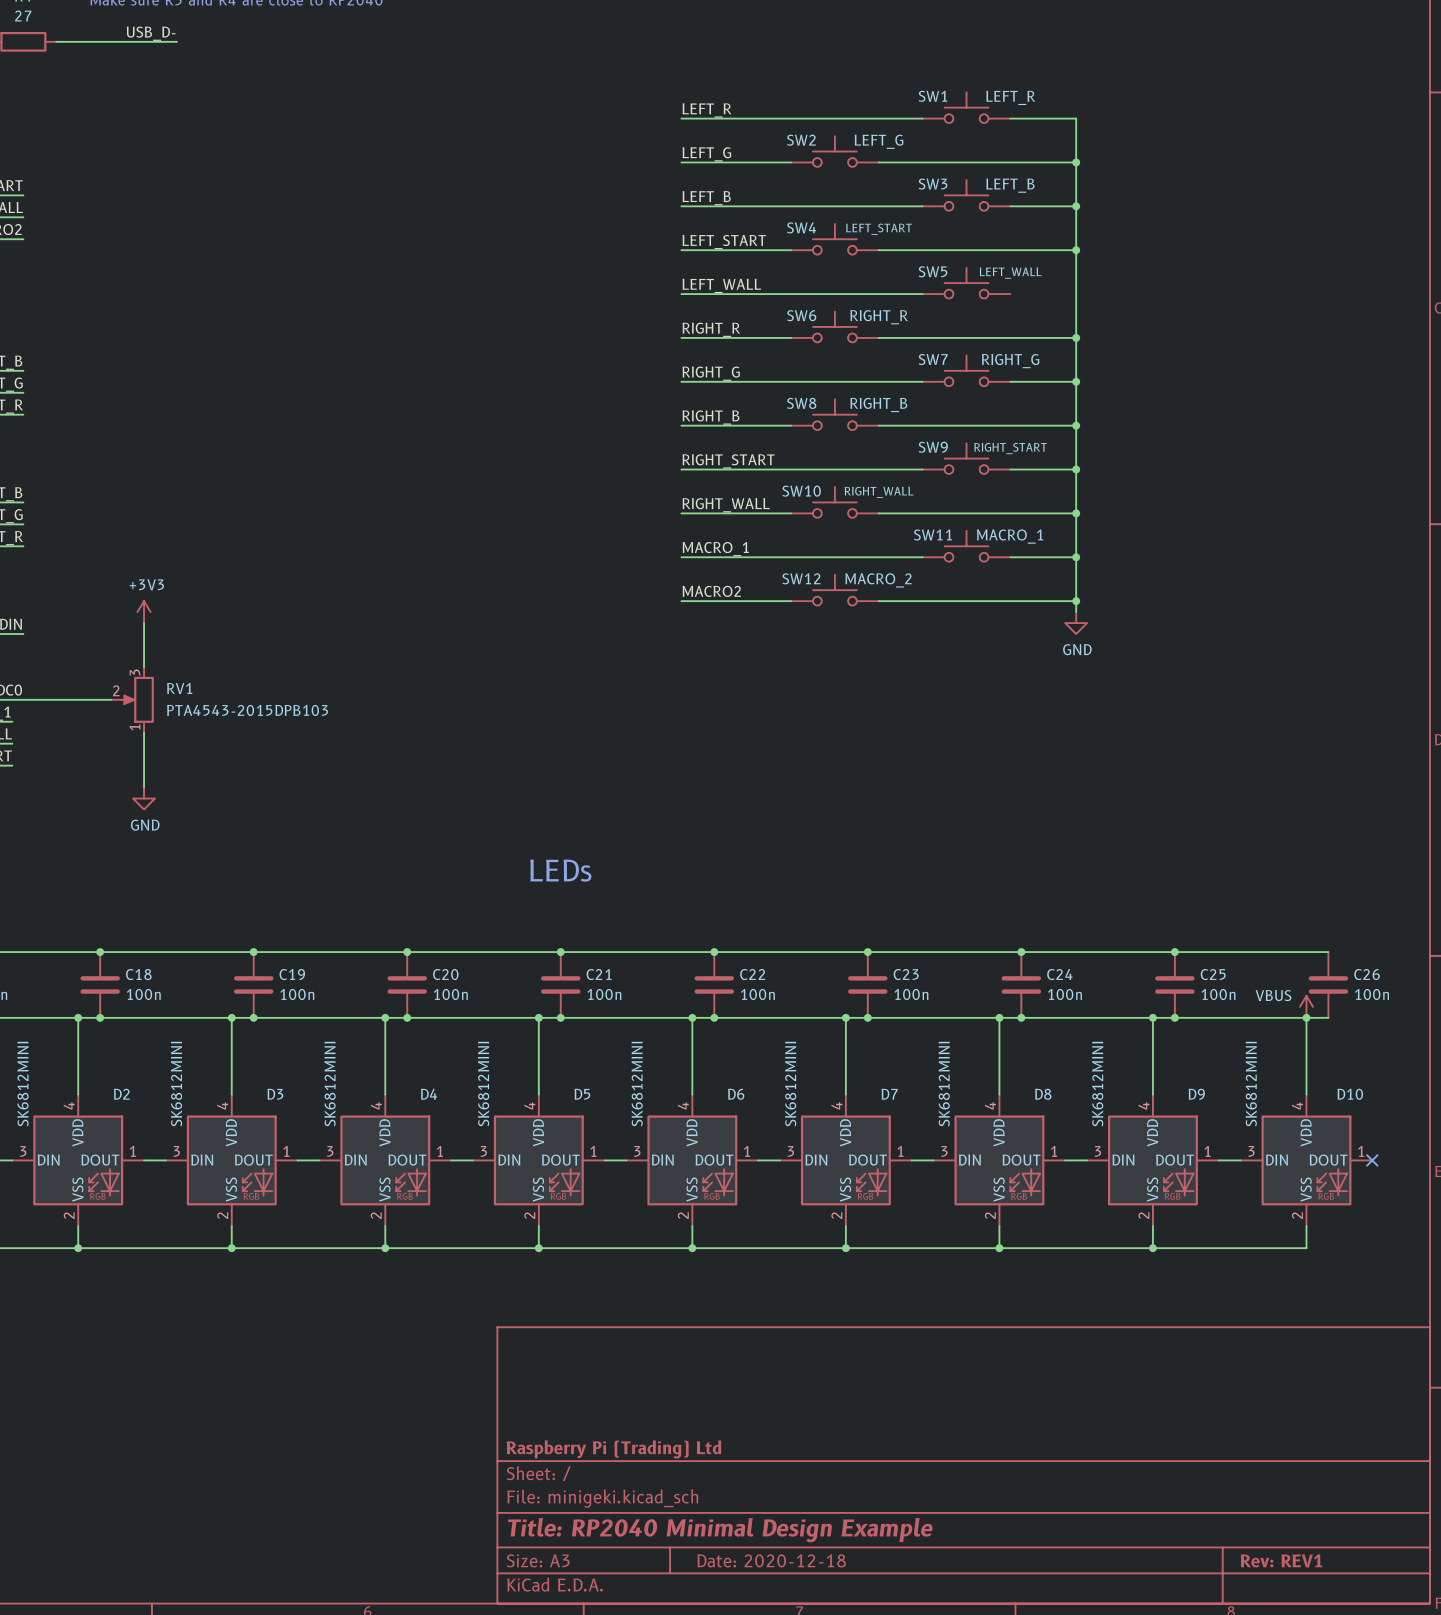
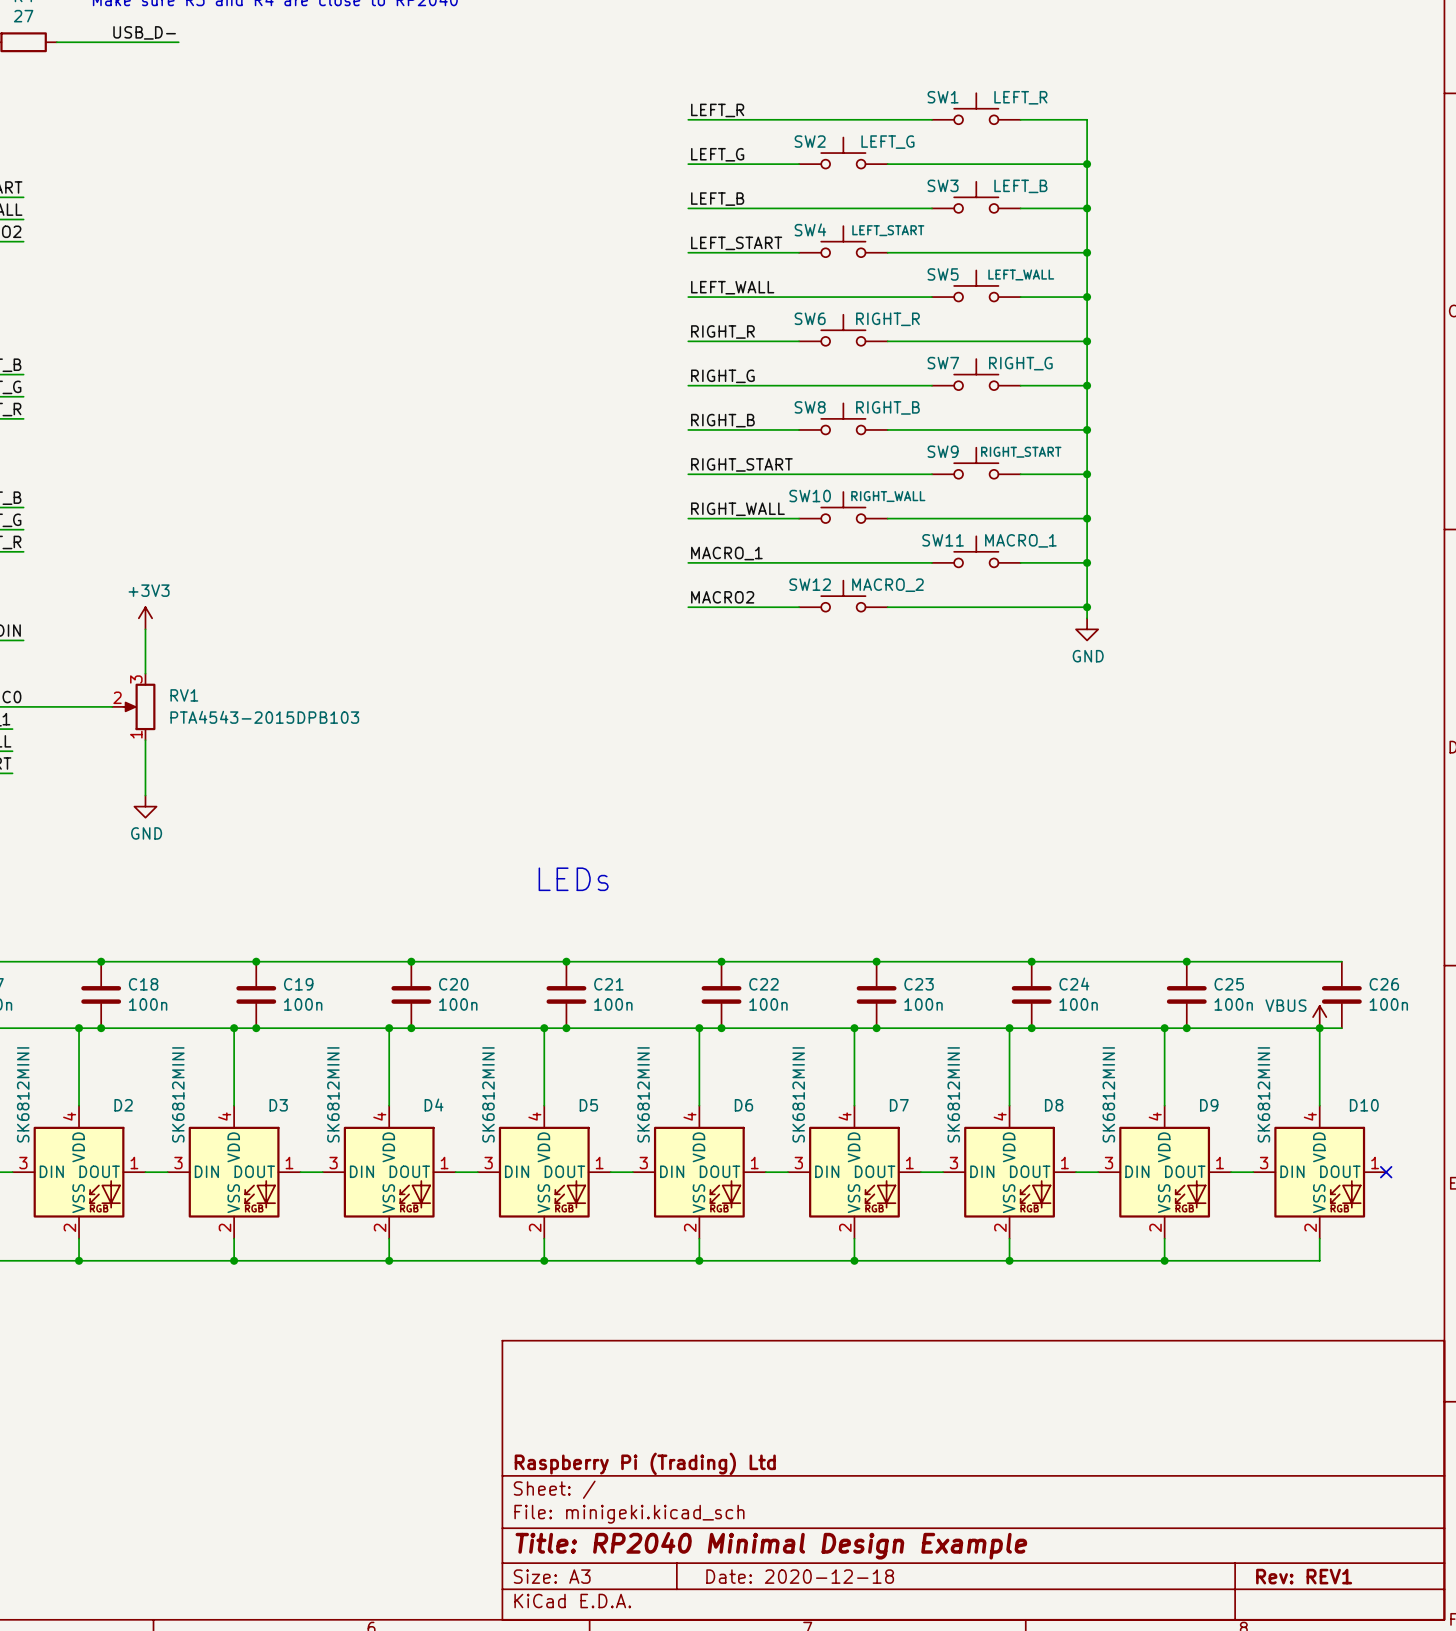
wire: none -> (1020, 297) (1087, 297)
junction: none -> (1087, 297)

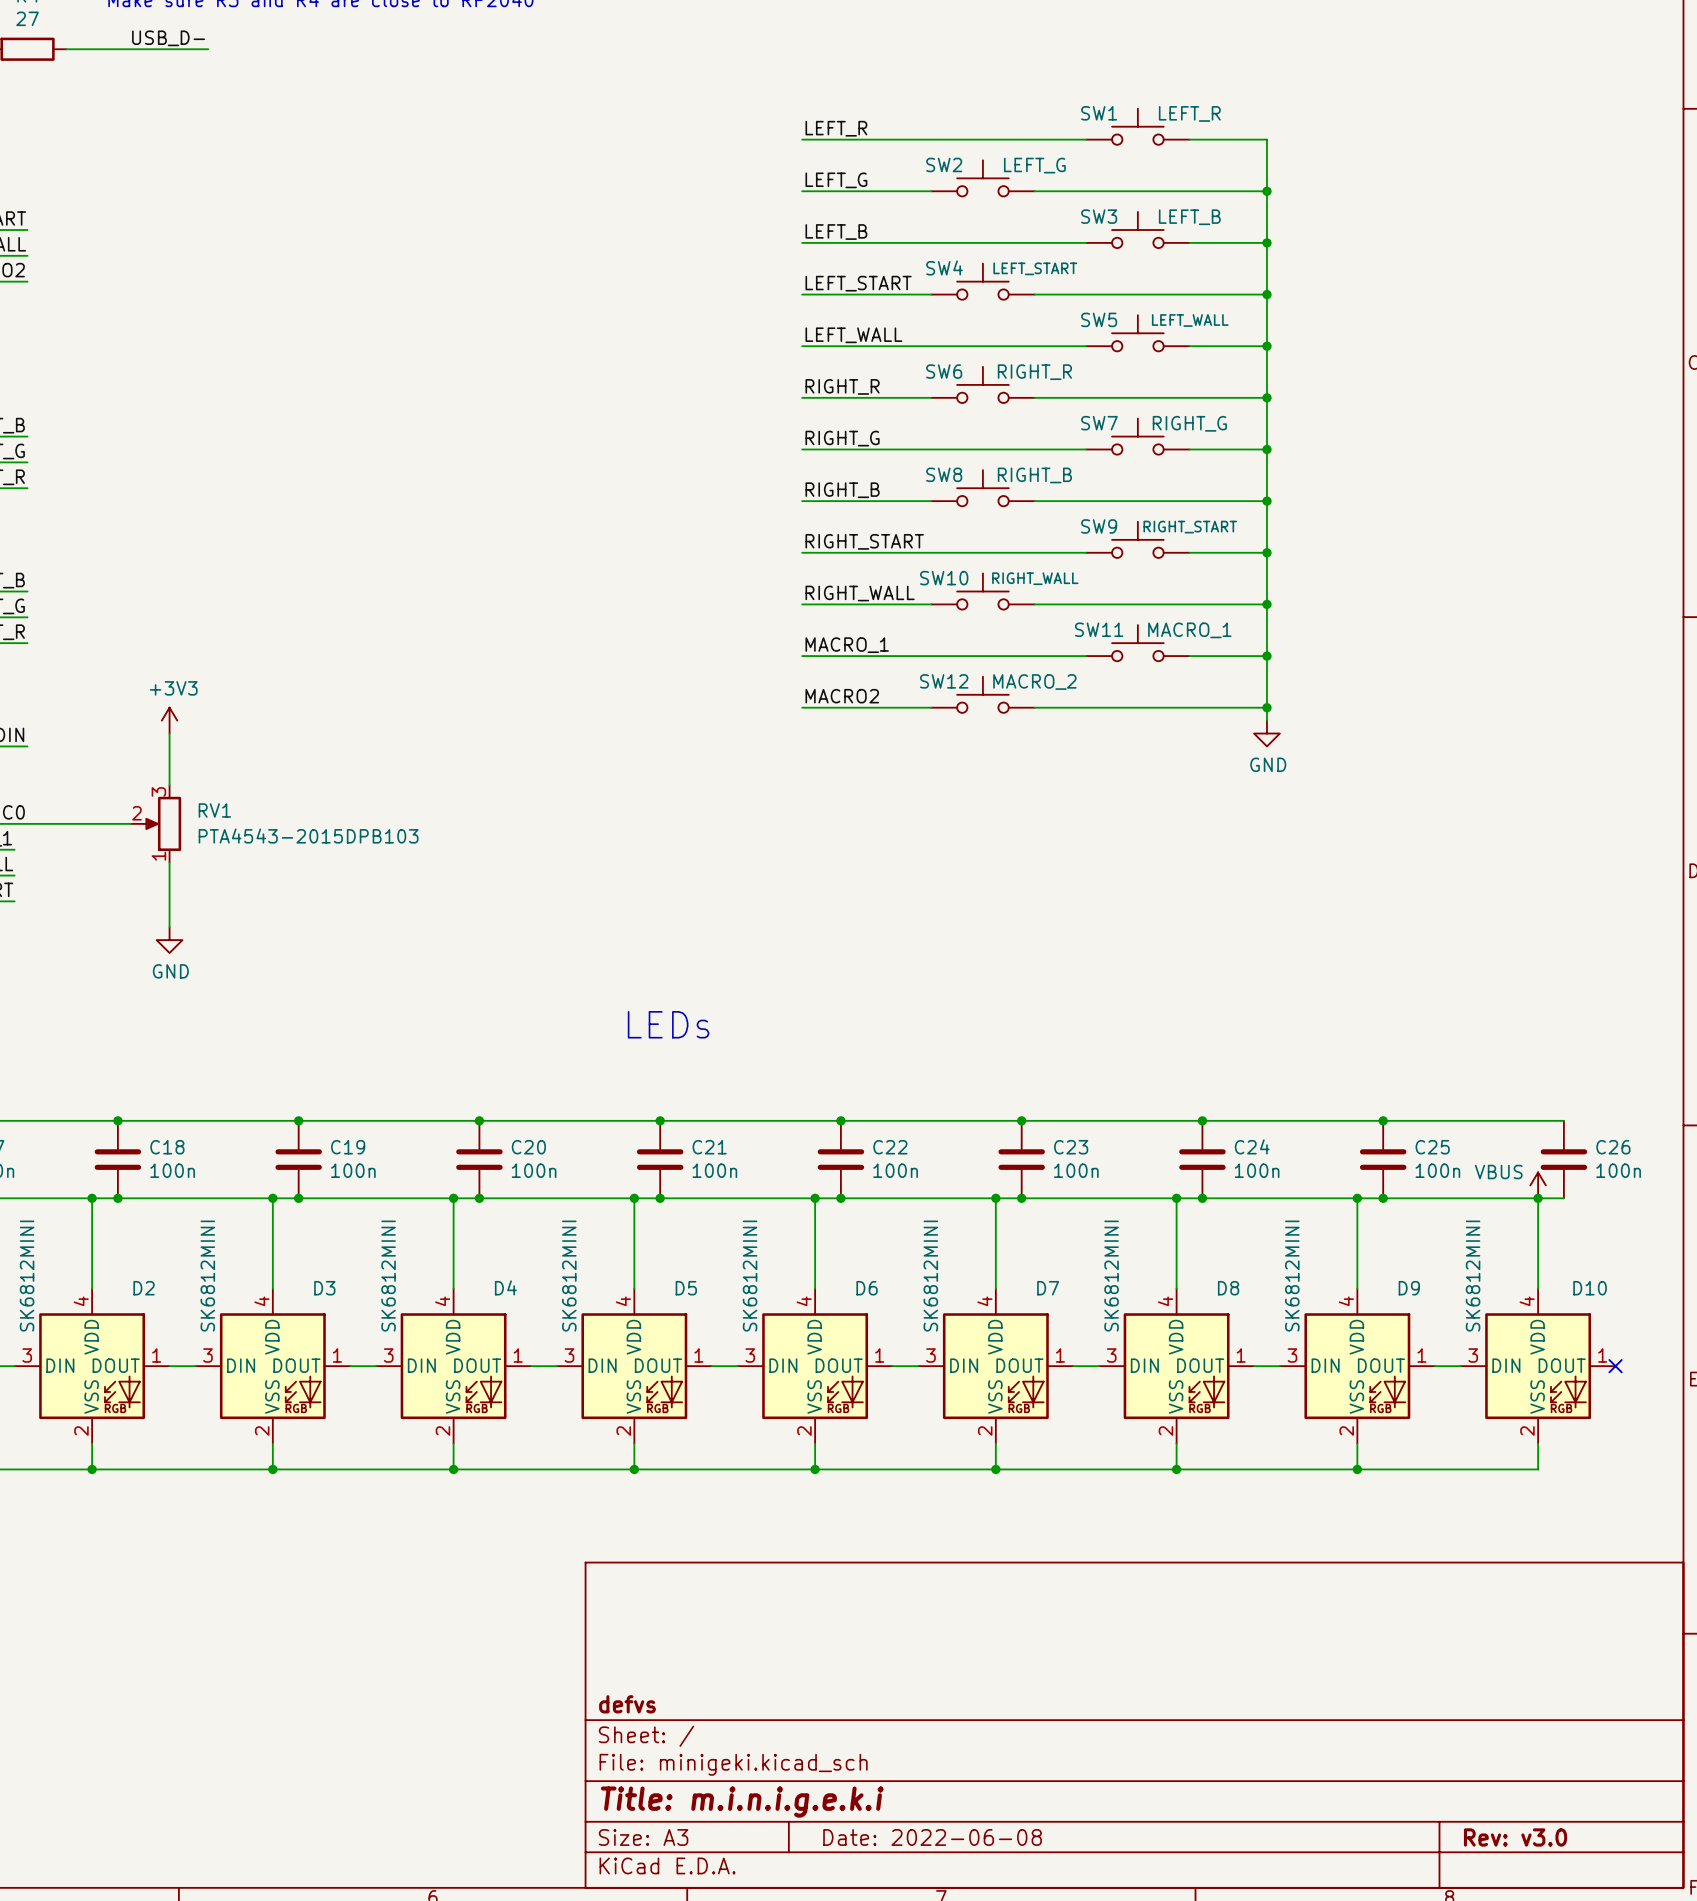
title block: Raspberry Pi (Trading) Ltd (645, 1463) -> defvs (627, 1704)
title block: Title: RP2040 Minimal Design Example (771, 1545) -> Title: m.i.n.i.g.e.k.i (742, 1802)
title block: Date: 2020-12-18 (800, 1576) -> Date: 2022-06-08 (932, 1837)
title block: Rev: REV1 (1304, 1576) -> Rev: v3.0 (1515, 1837)

